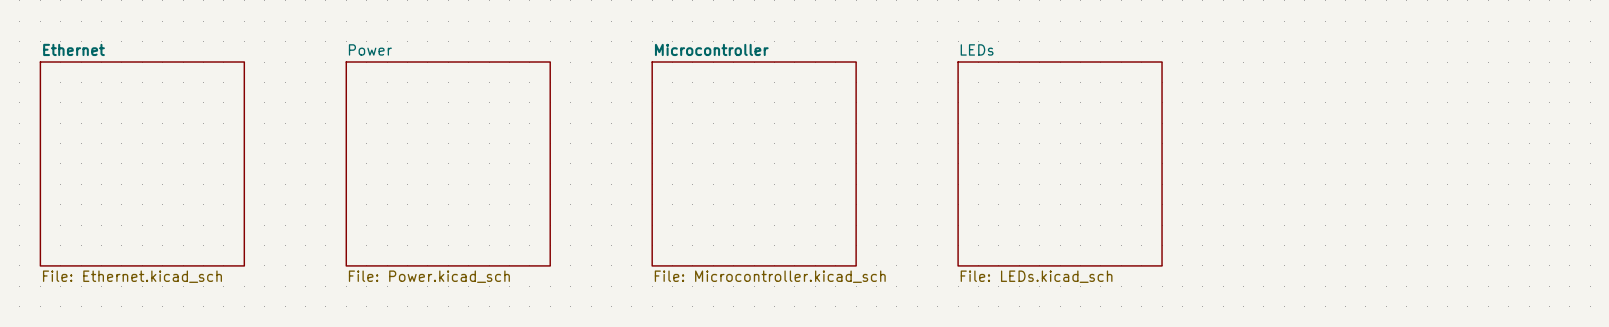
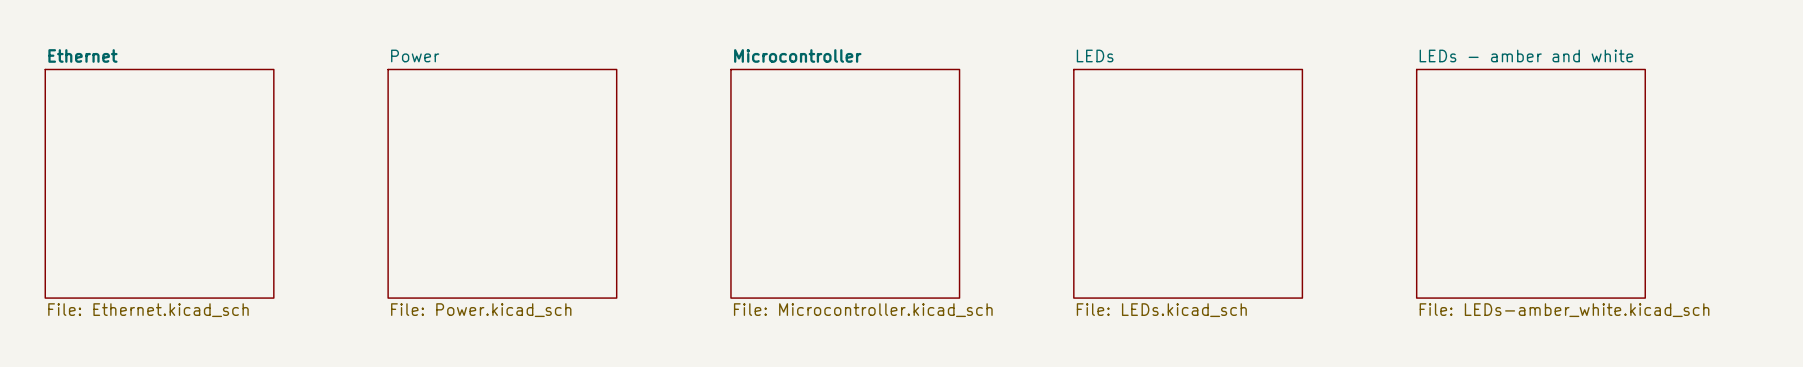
sheet LEDs - amber and white: none -> File: LEDs-amber_white.kicad_sch (1530, 183)

